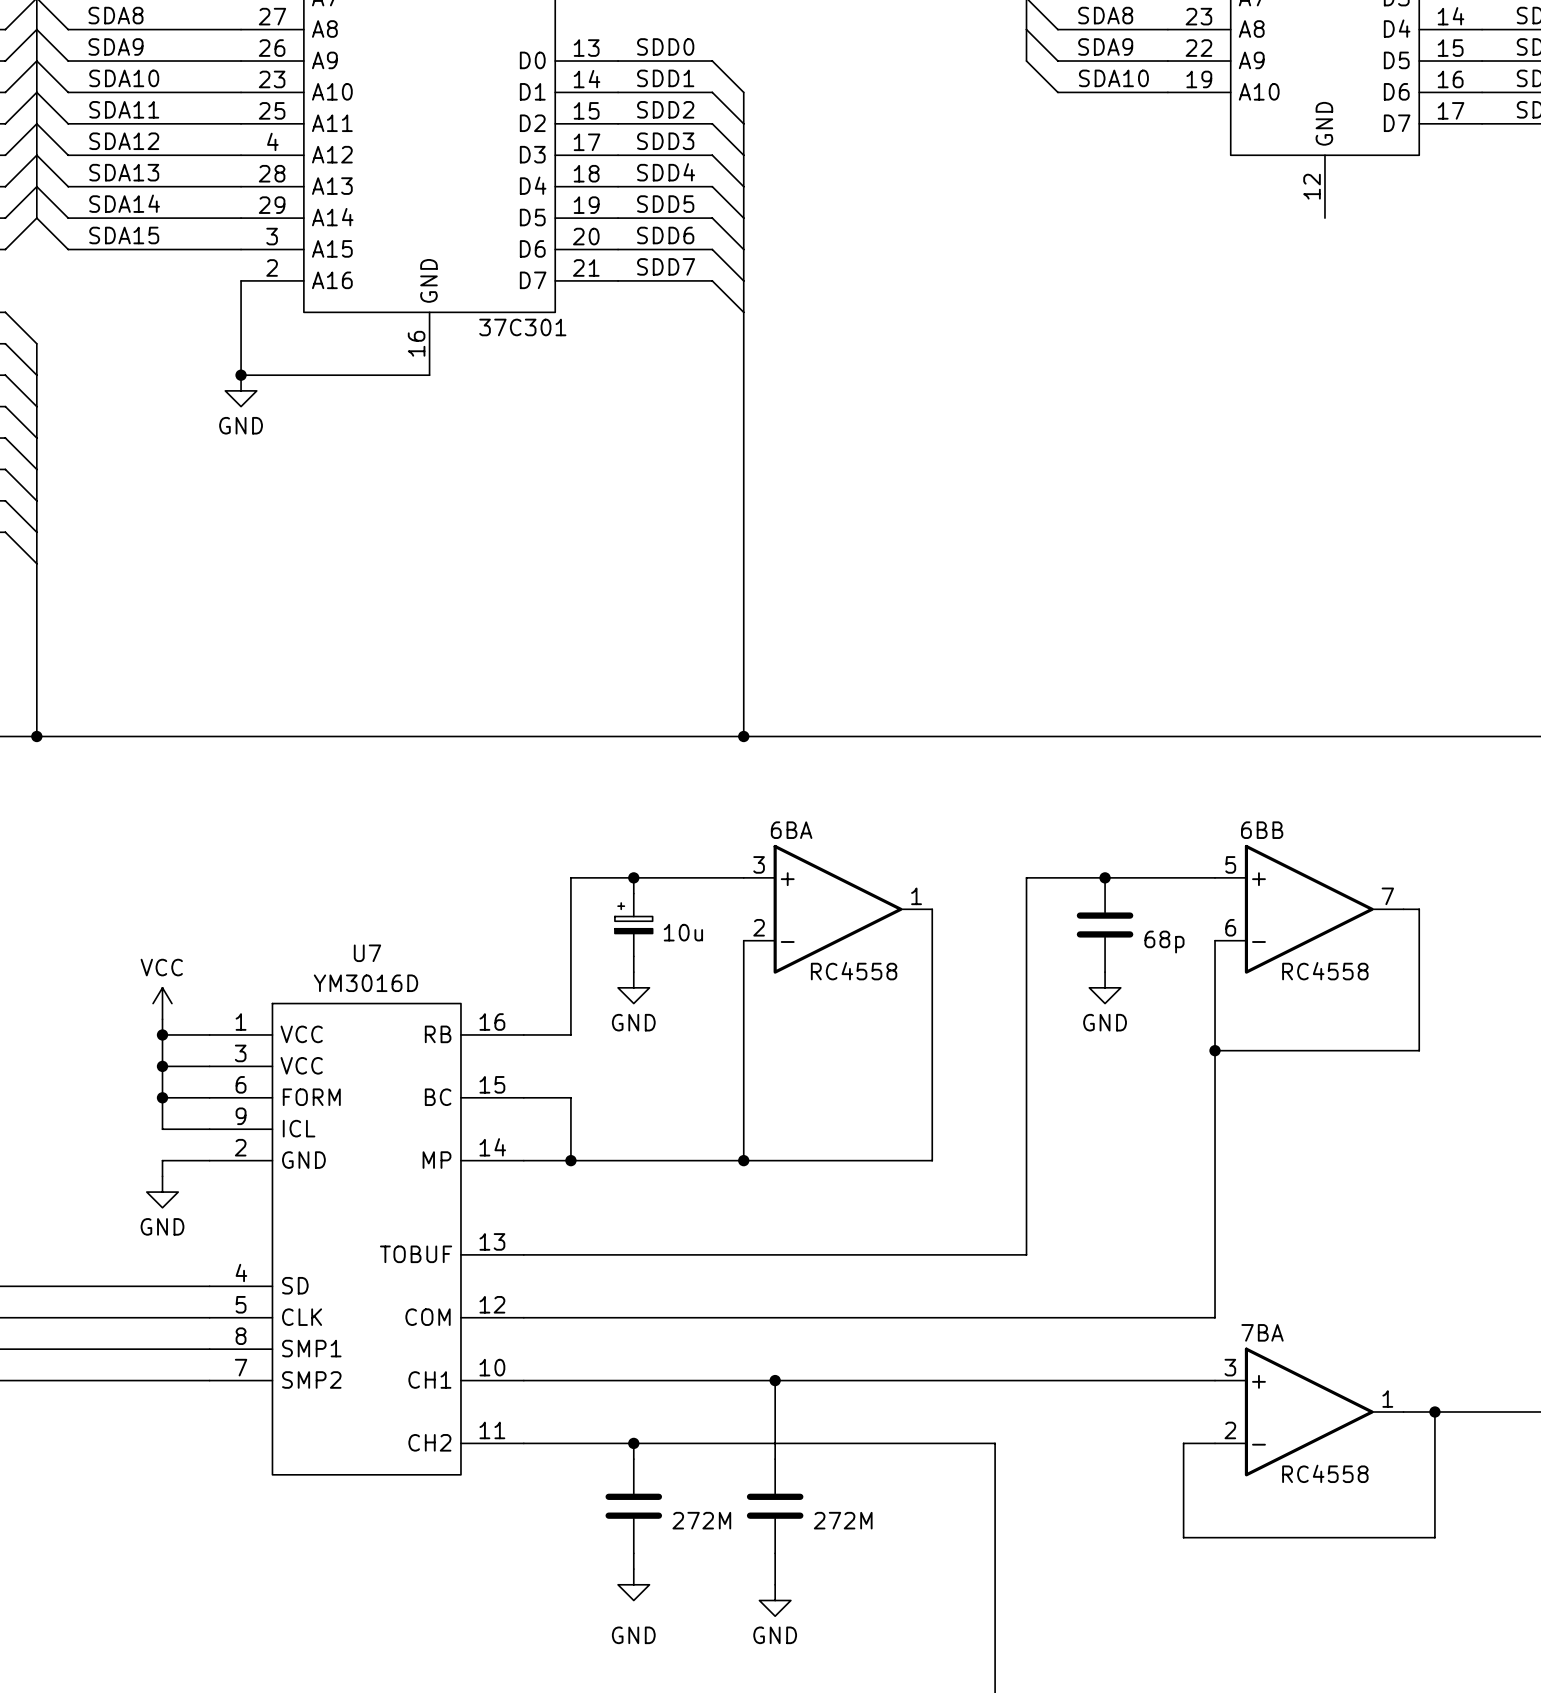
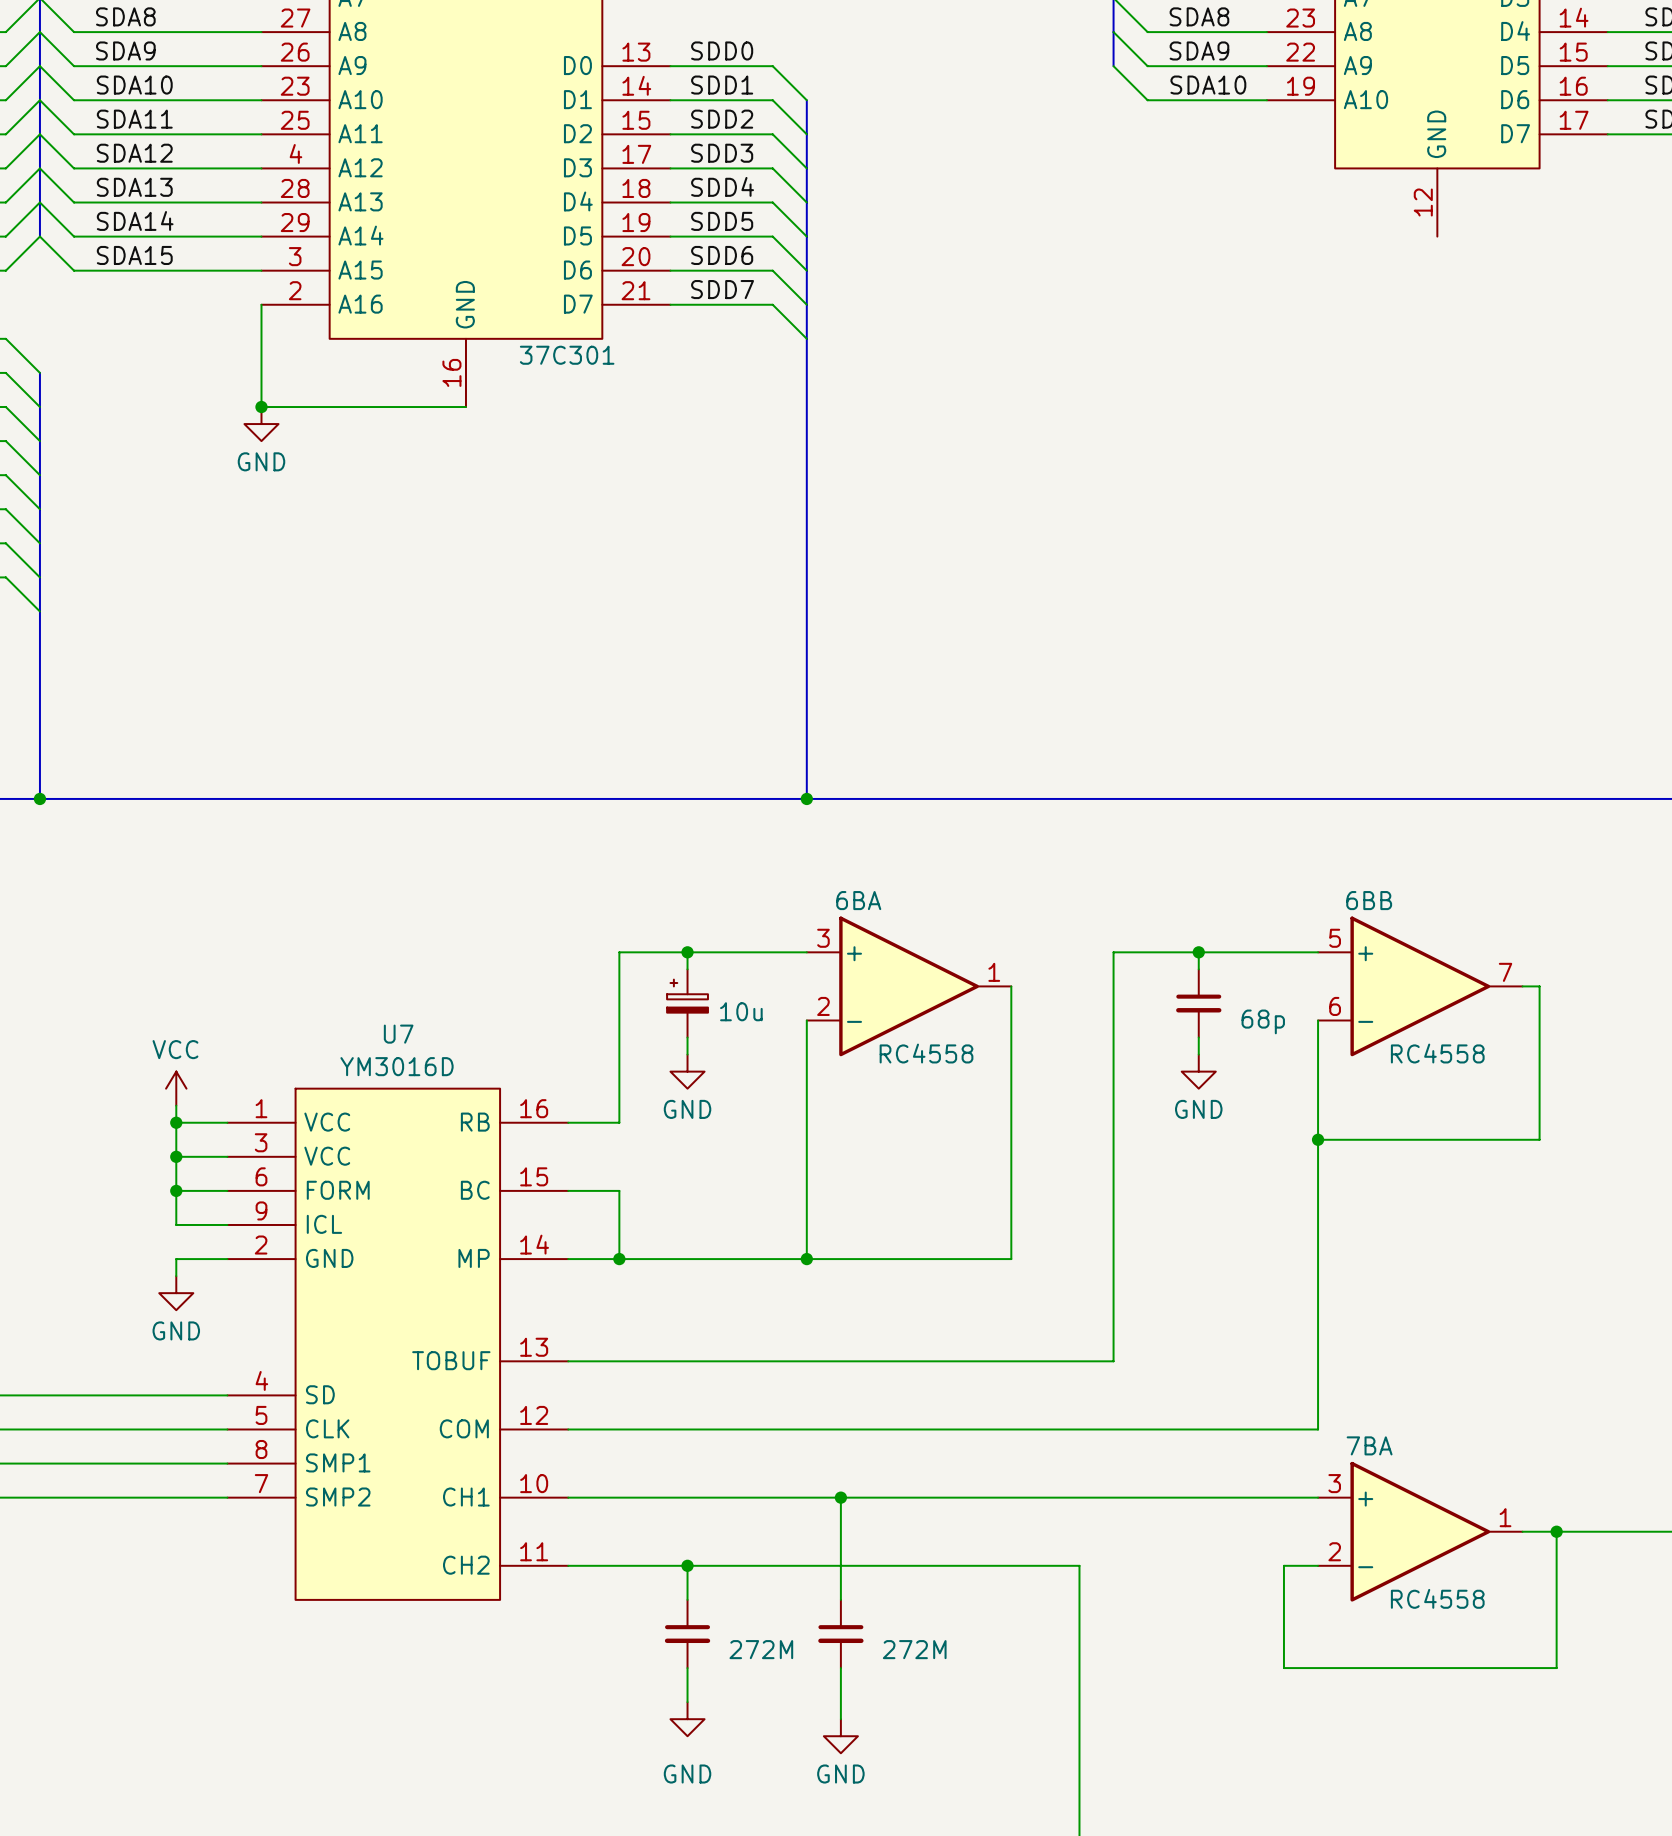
part symbol: [1076, 877, 1134, 973] -> [1176, 969, 1222, 1038]
part symbol: [605, 1459, 663, 1554] -> [664, 1599, 711, 1669]
part symbol: [746, 1459, 804, 1554] -> [818, 1599, 864, 1669]

